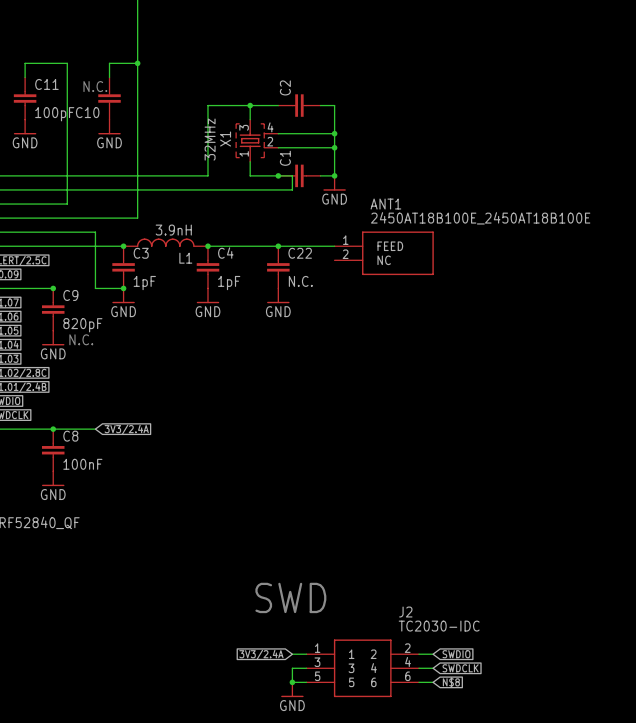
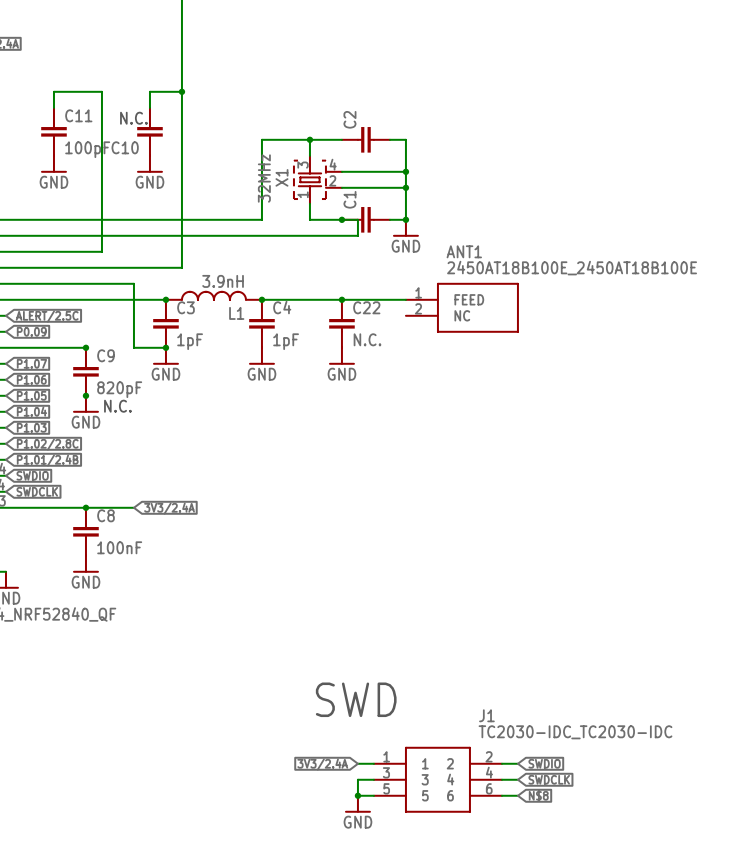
junction: none -> (85, 395)
J2 name: J2 (405, 612) -> J1 (486, 715)
J2 value: TC2030-IDC (439, 626) -> TC2030-IDC_TC2030-IDC (575, 732)

